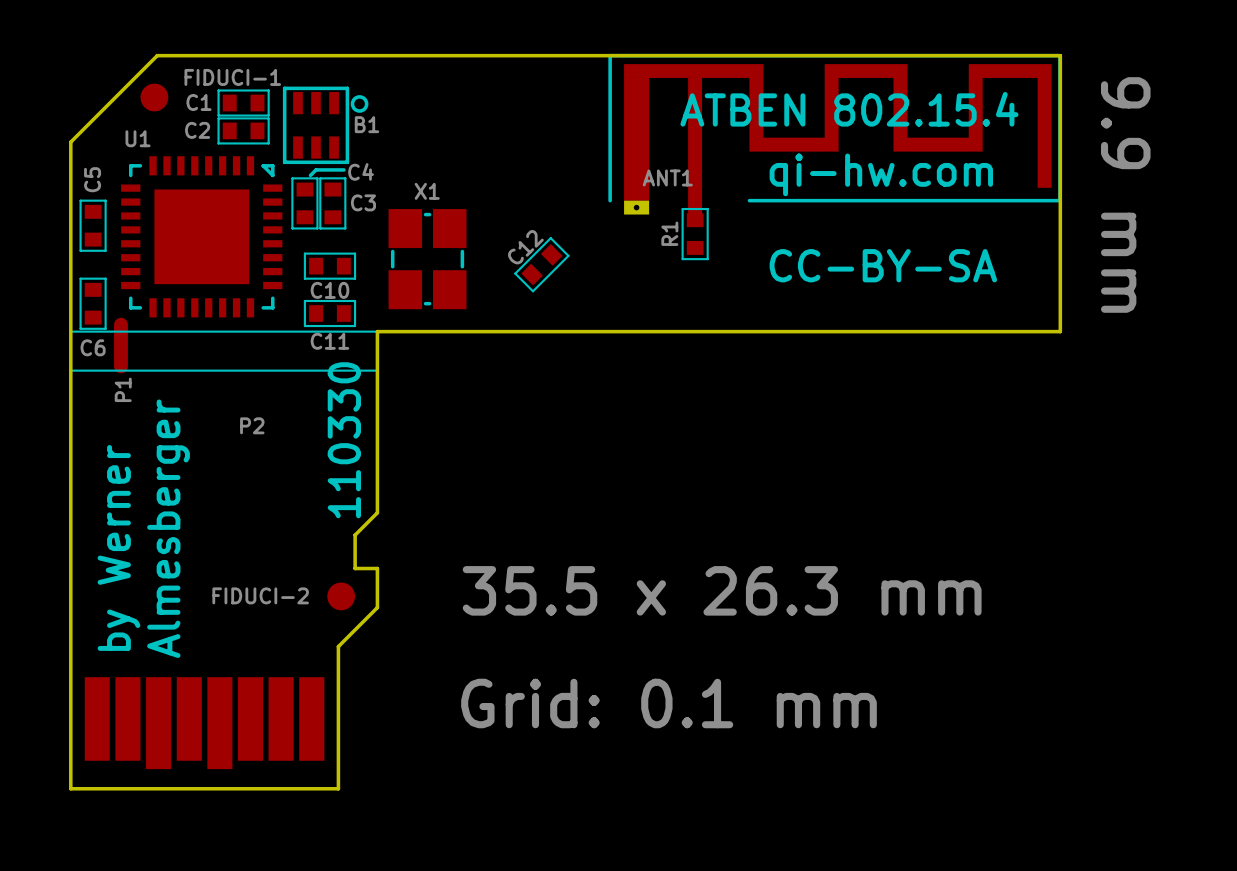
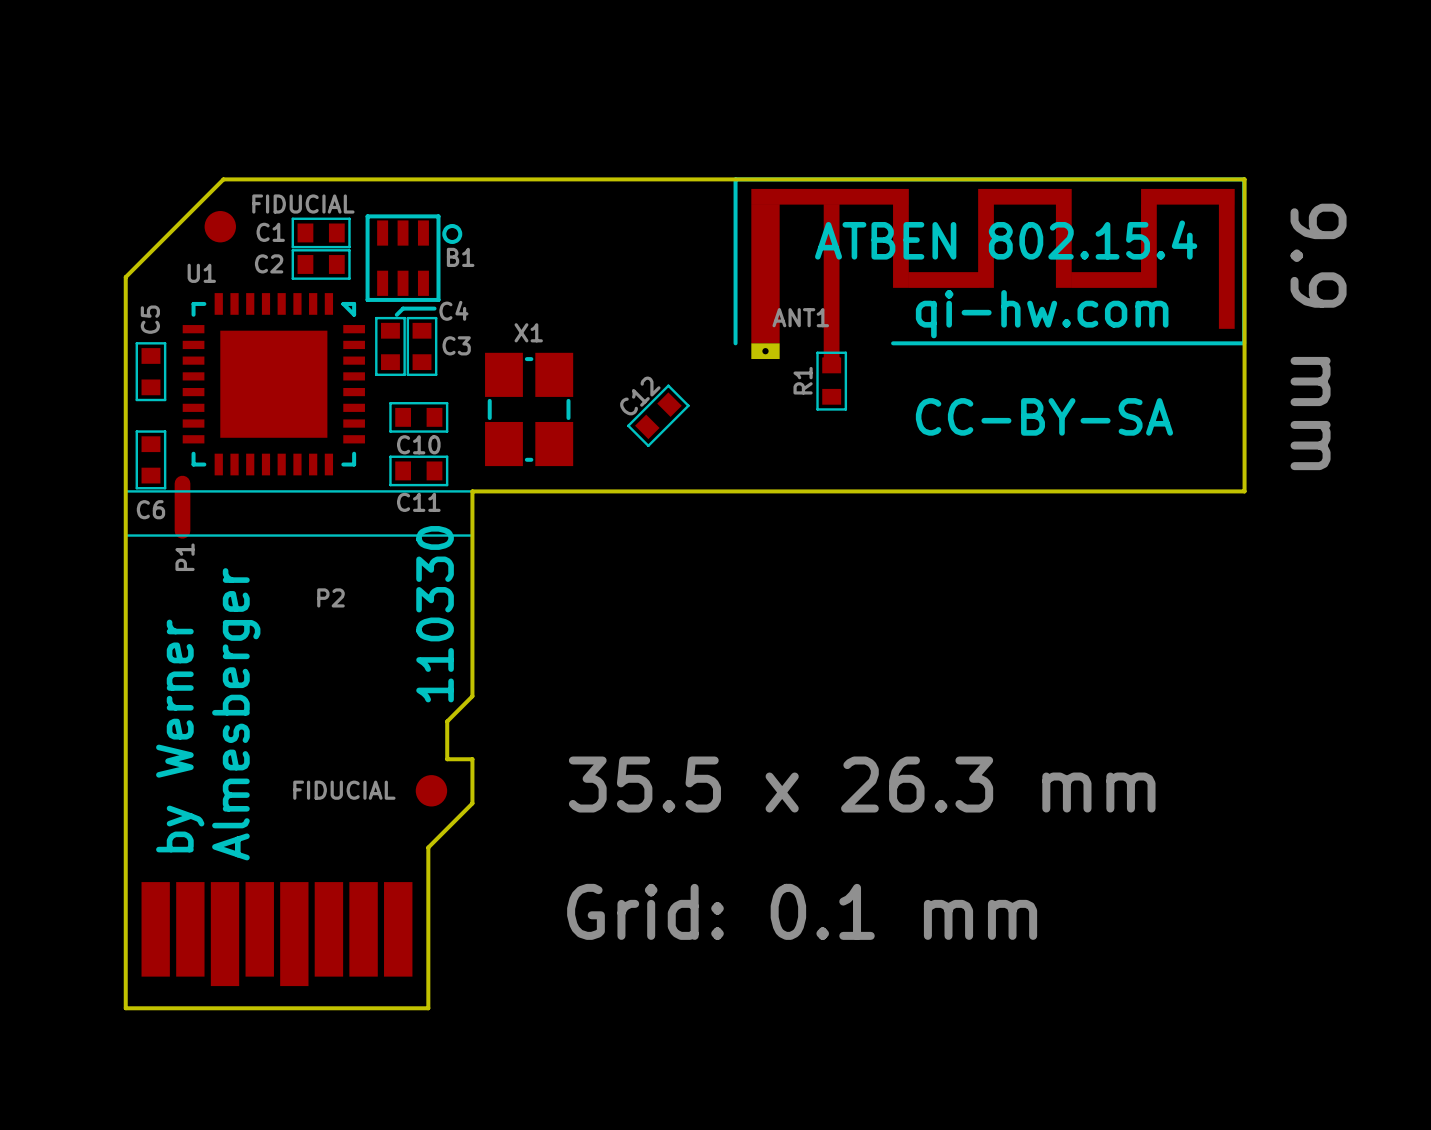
FIDUCI-1 name: FIDUCI-1 (232, 77) -> FIDUCIAL (303, 204)
FIDUCI-2 name: FIDUCI-2 (260, 595) -> FIDUCIAL (344, 790)

